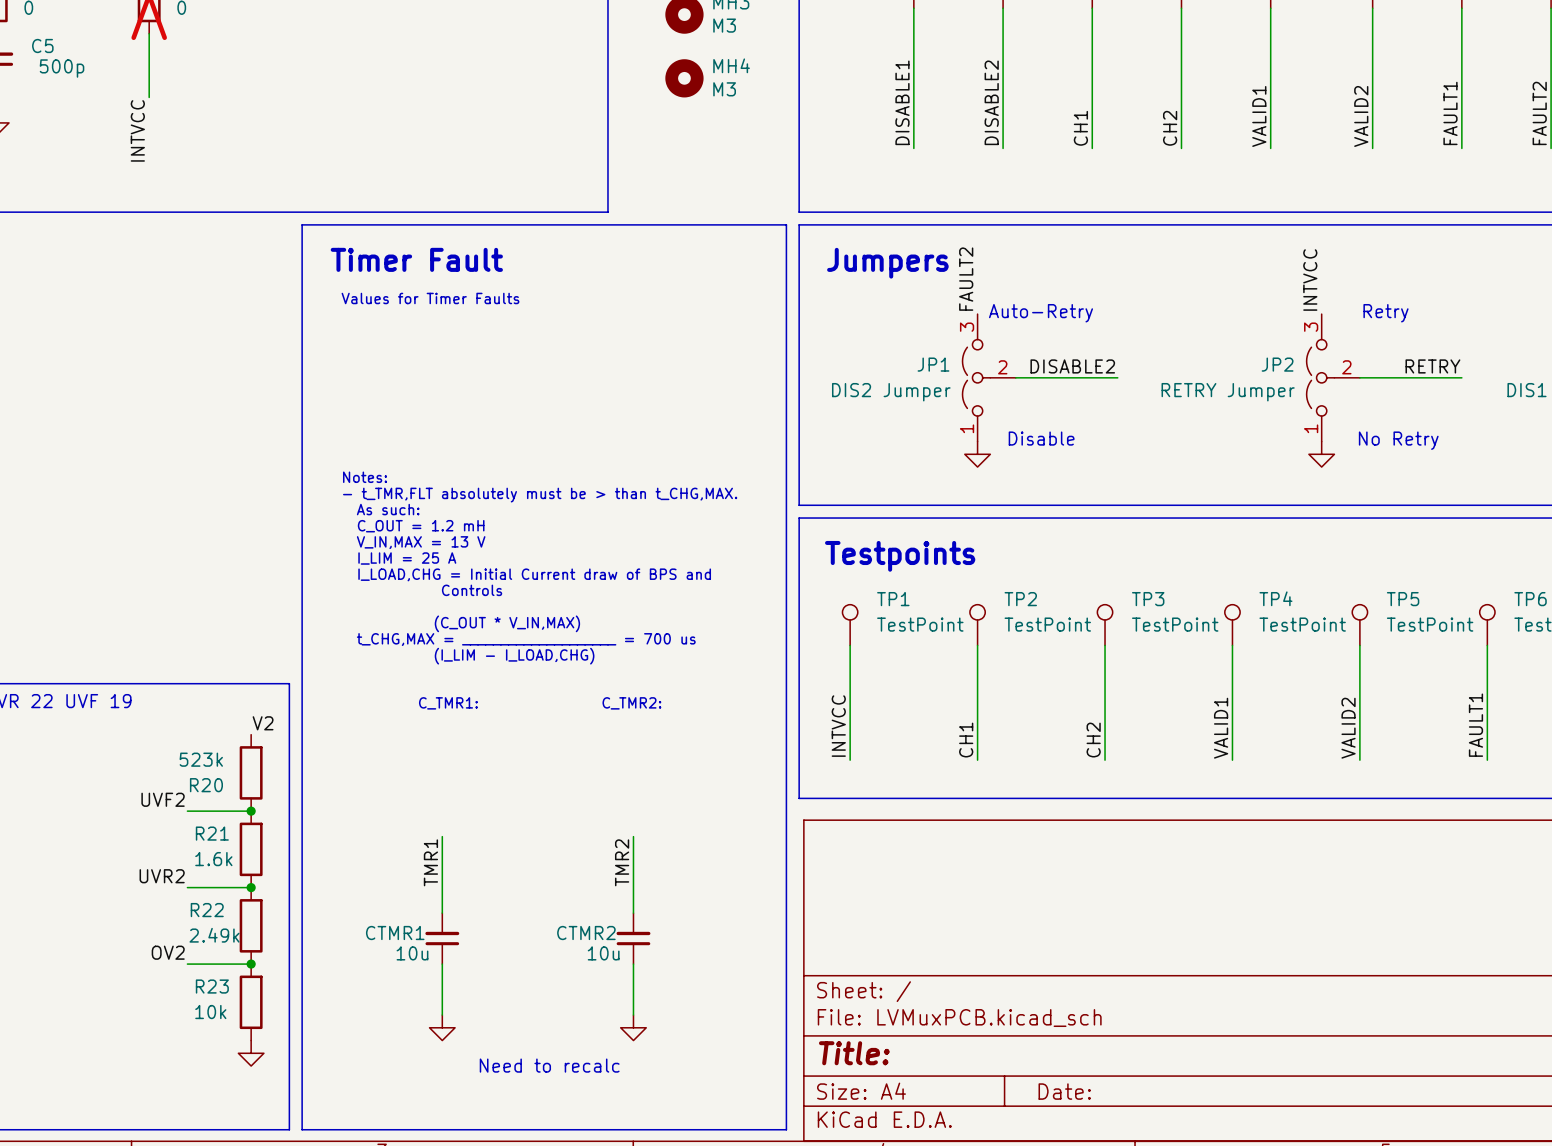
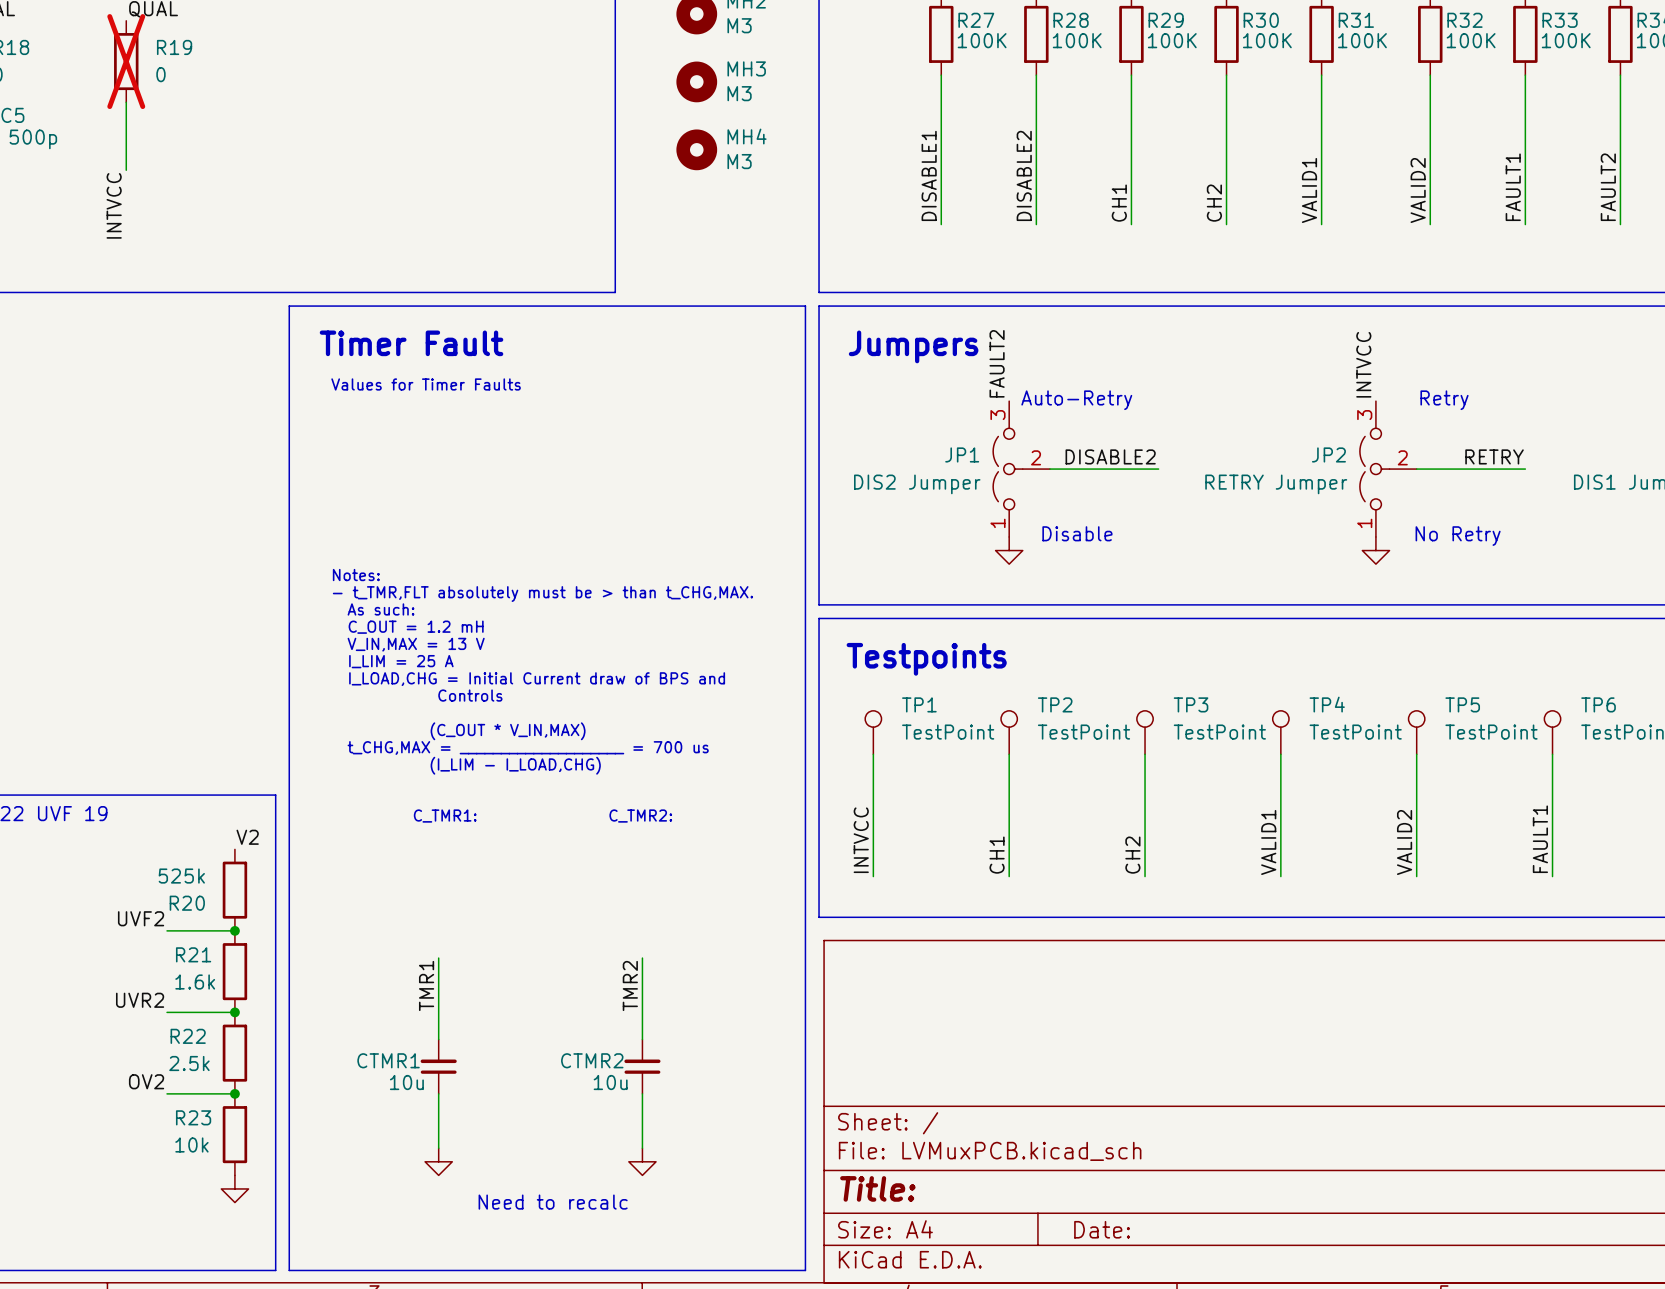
R20 value: 523k (201, 759) -> 525k (181, 876)
R22 value: 2.49k (214, 935) -> 2.5k (189, 1063)

